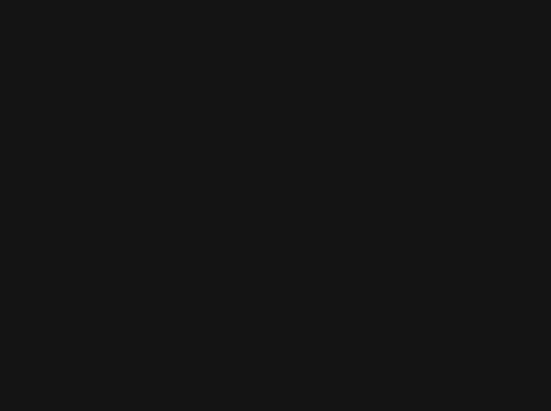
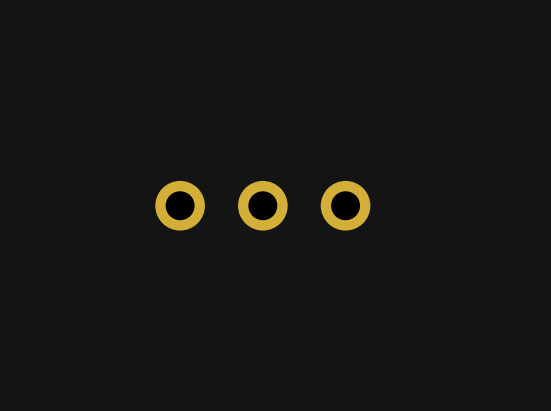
part: none -> (262, 205)

